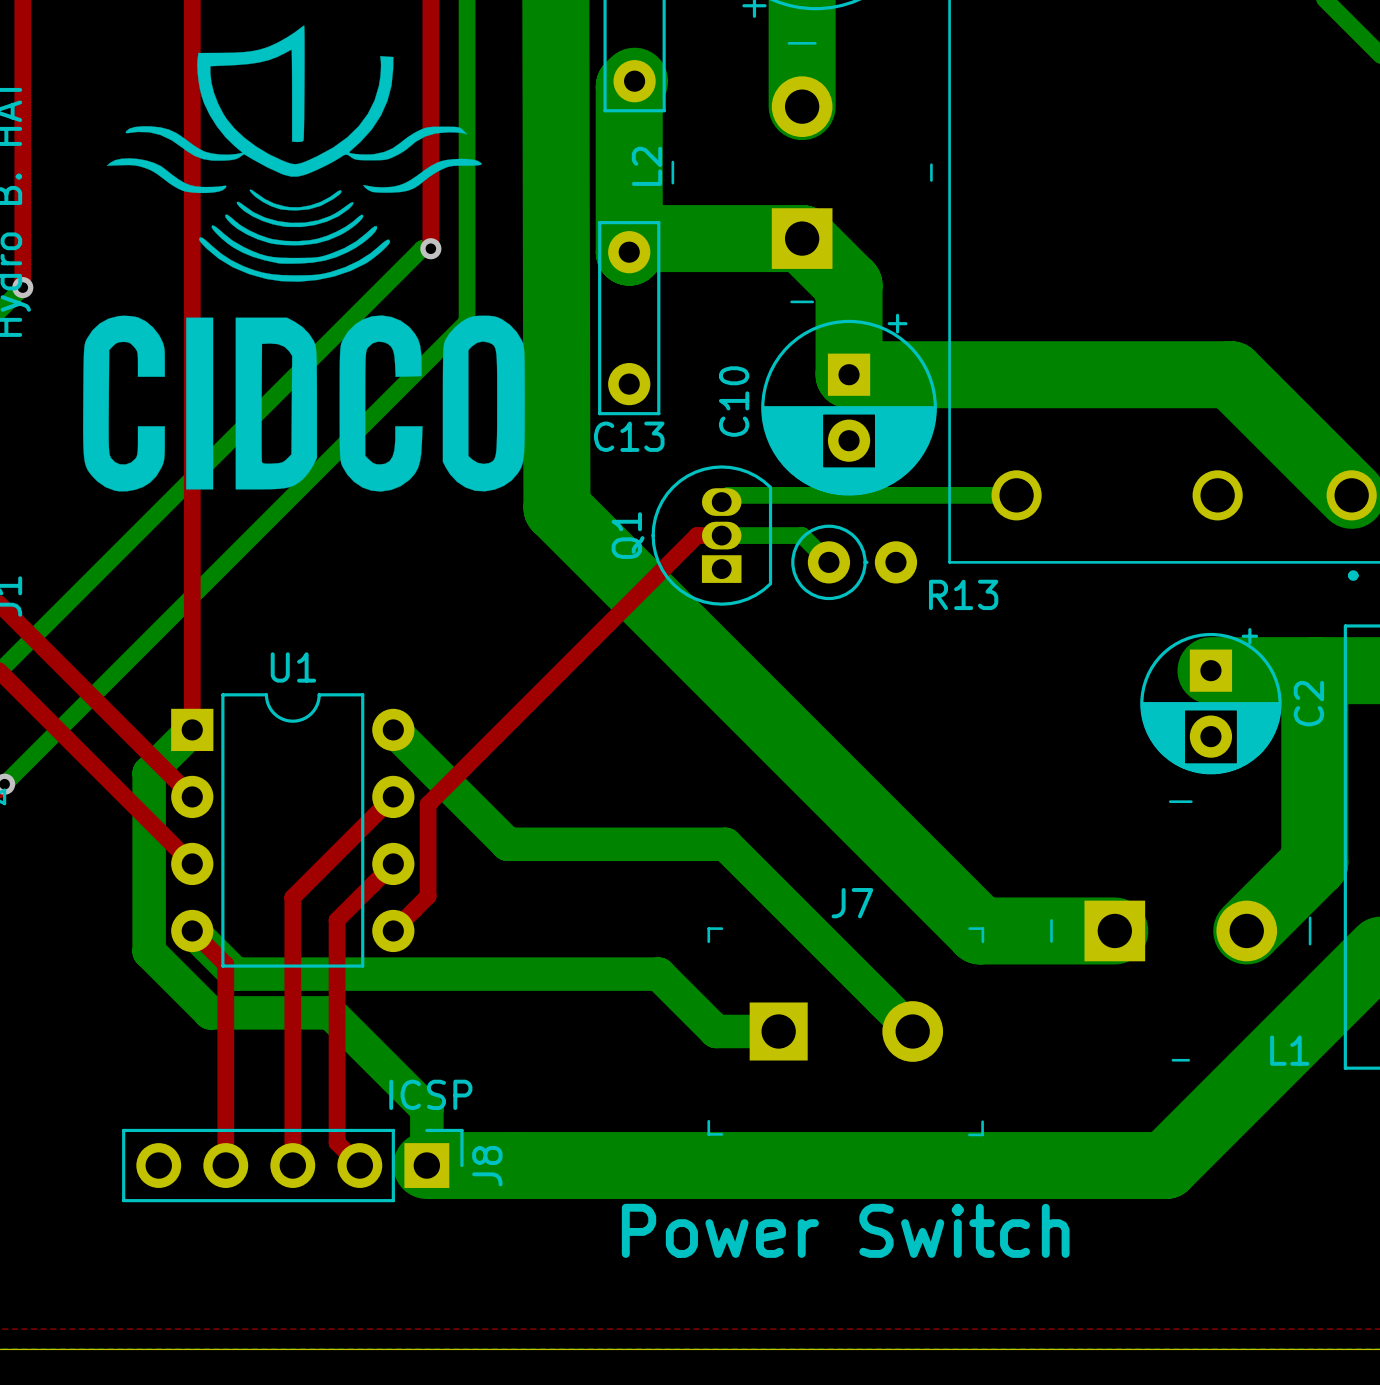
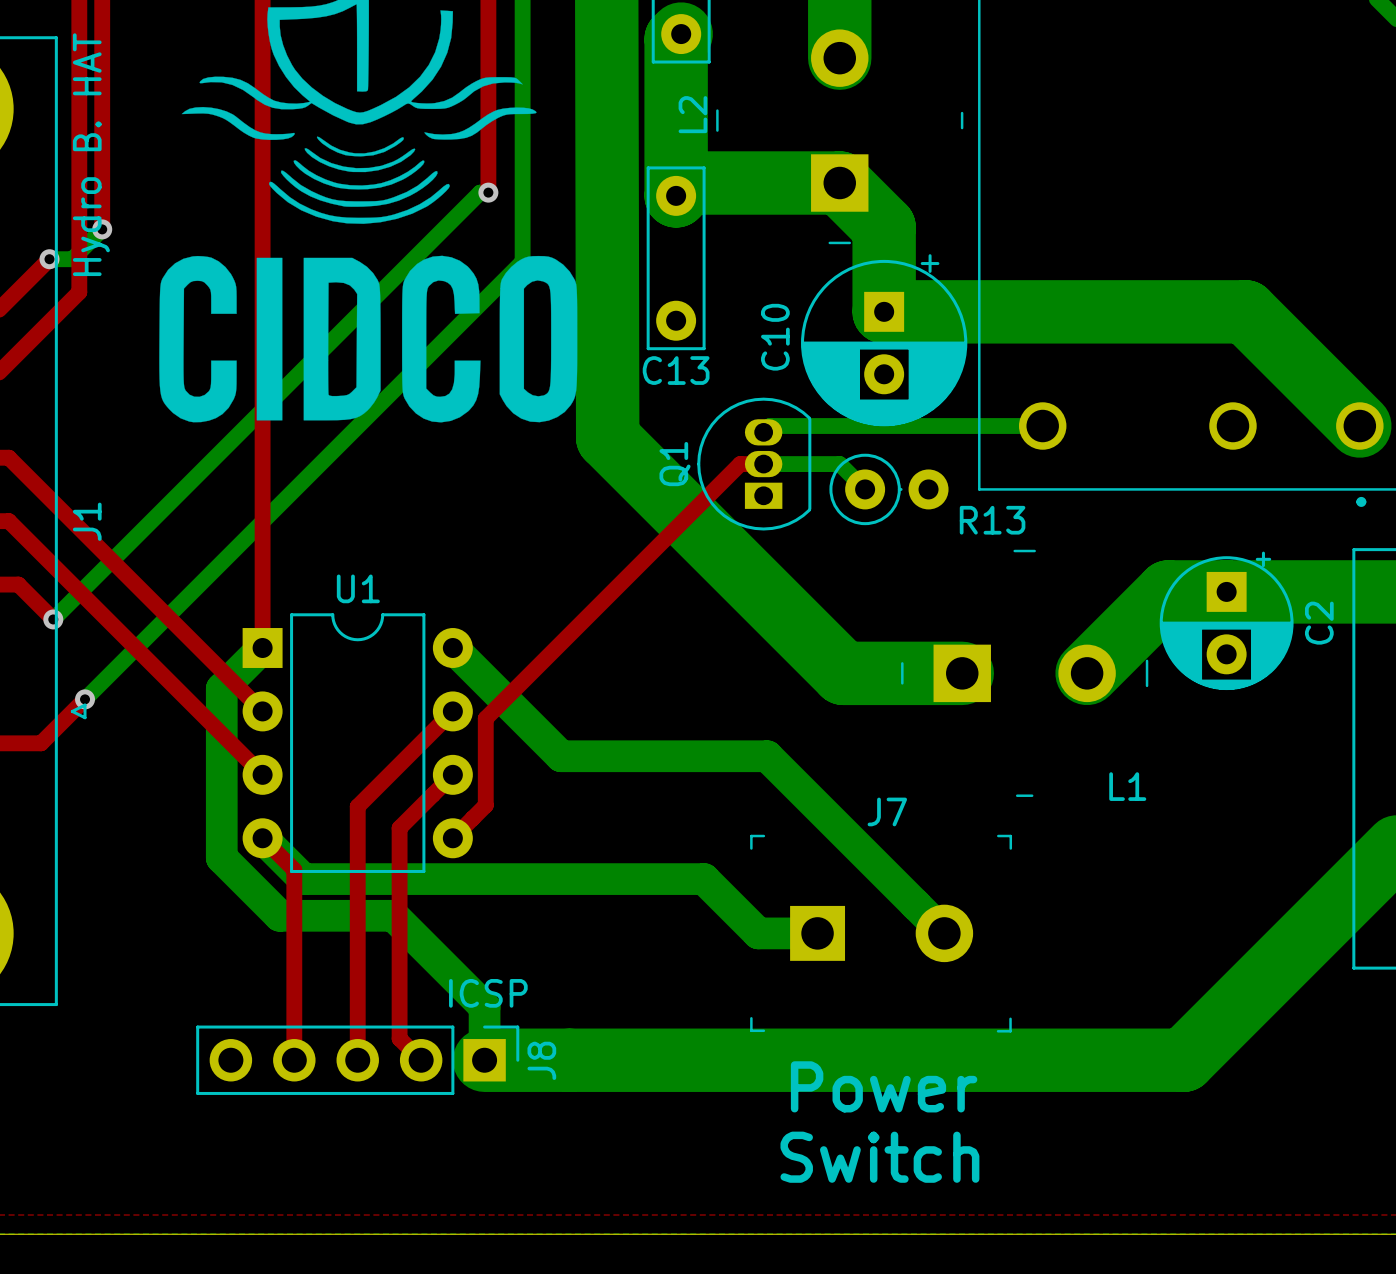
bottom track: none -> (1226, 591) (1168, 591) (1087, 673)
bottom track: (1314, 670) (1314, 862) (1246, 930) -> none
bottom track: (805, 756) (980, 930) (1114, 930) -> (843, 673) (962, 673)
L1 position: (1180, 930) -> (1024, 673)
text: none -> Power (884, 1086)
text: Power Switch (845, 1230) -> Switch (879, 1157)

